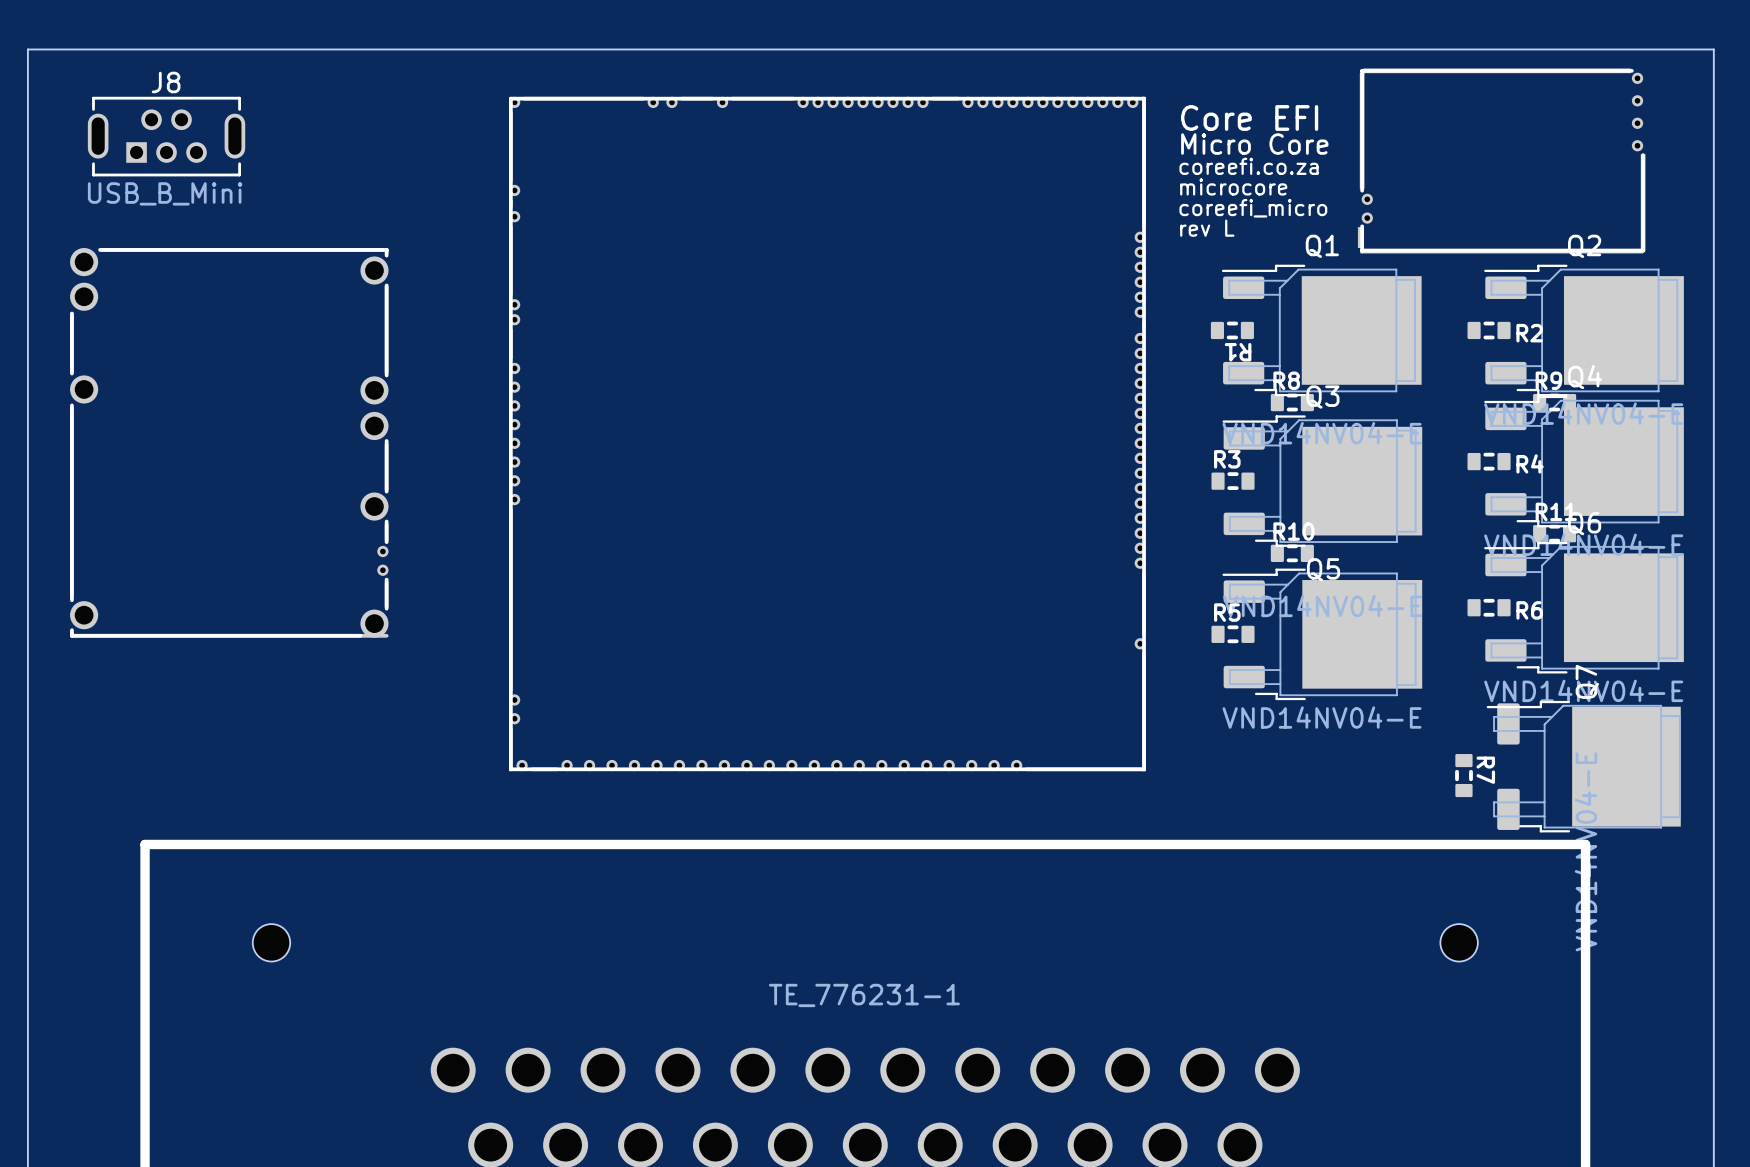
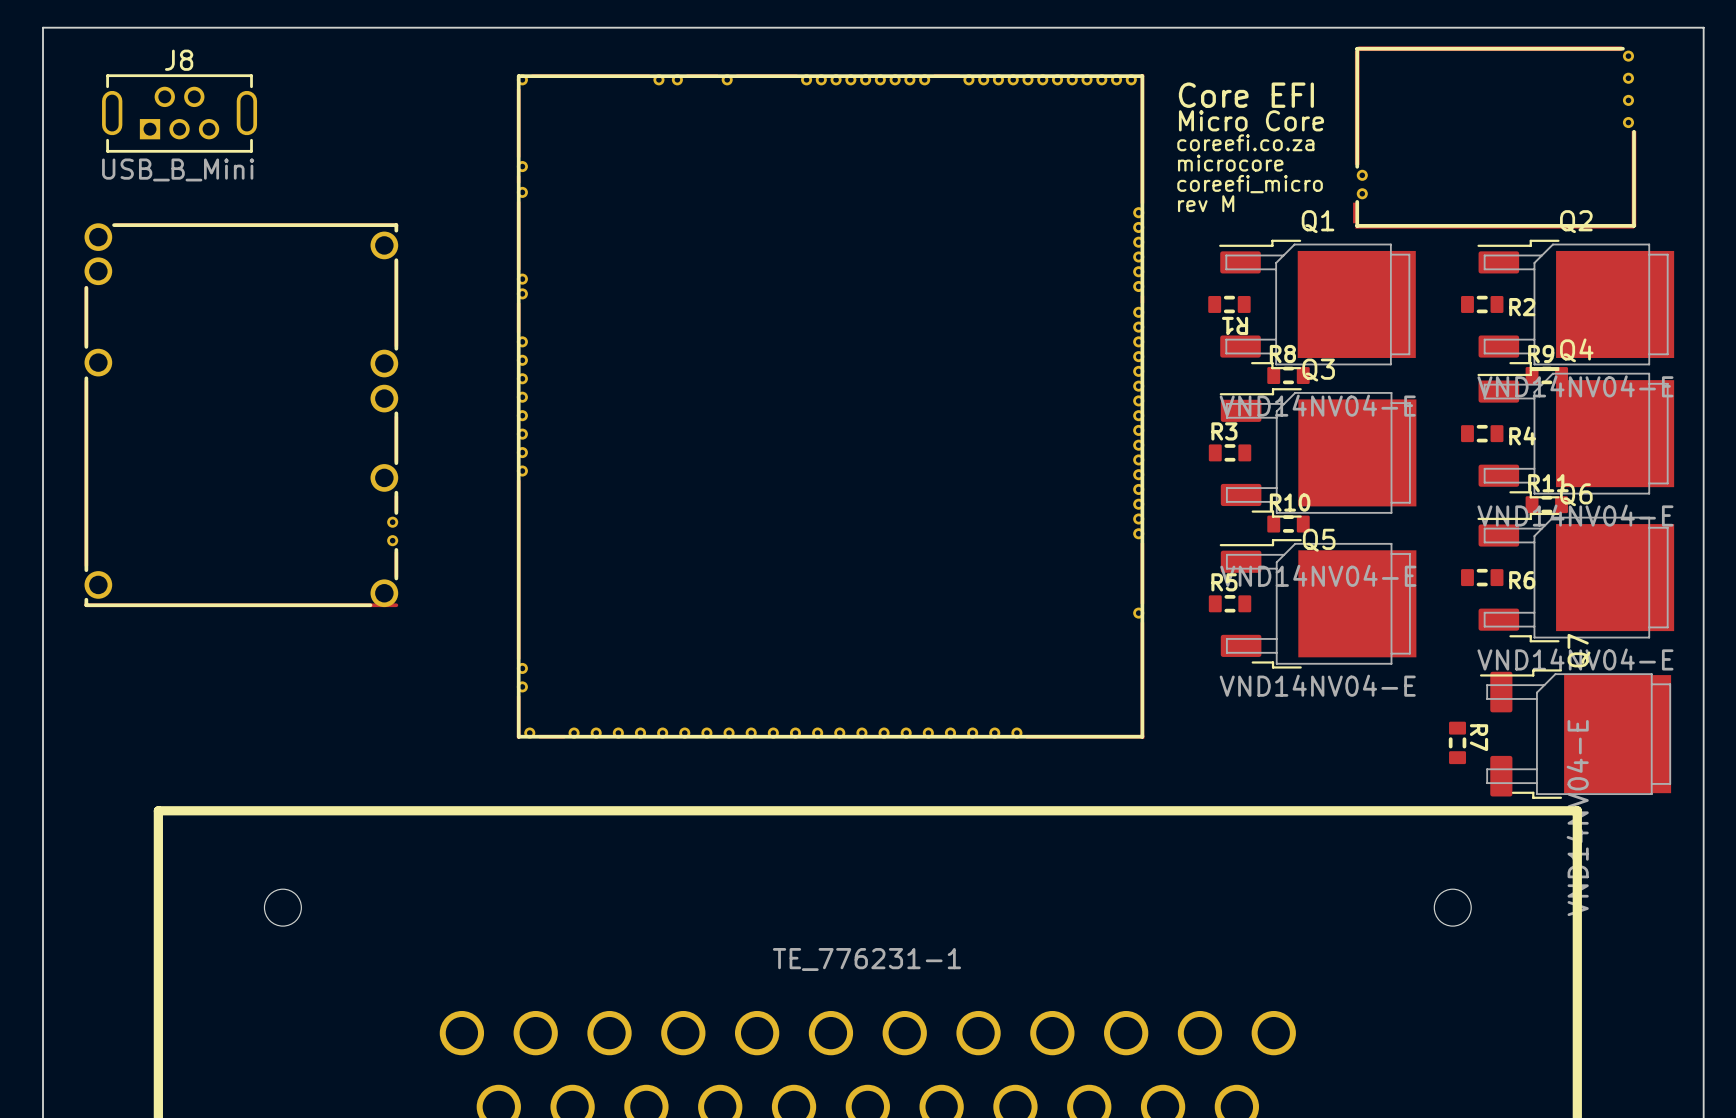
text: rev L (1207, 228) -> rev M (1206, 203)

